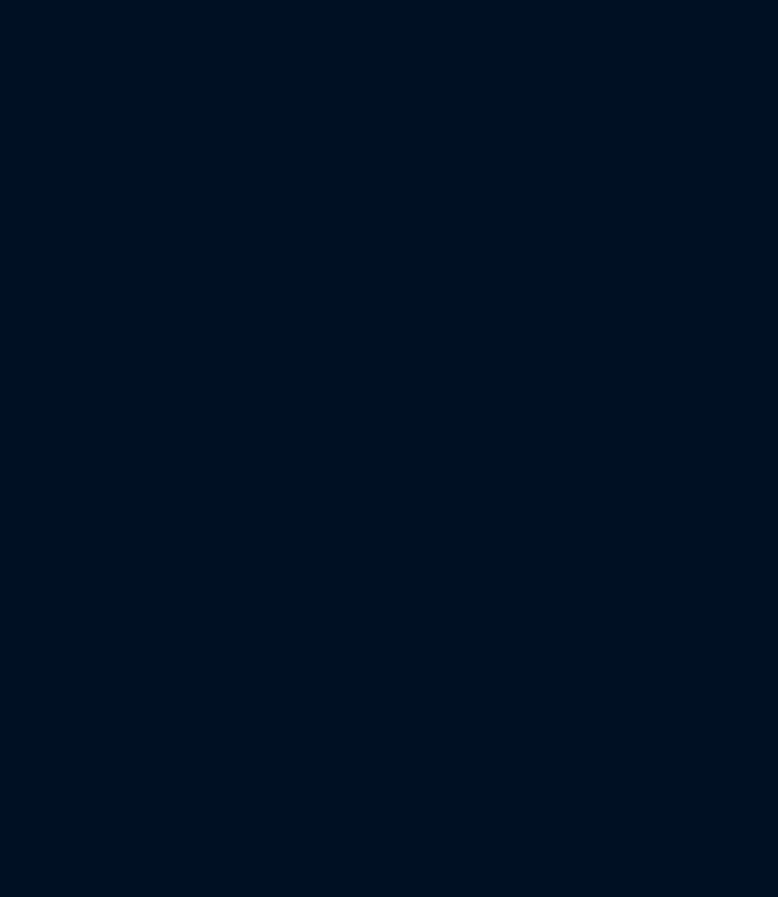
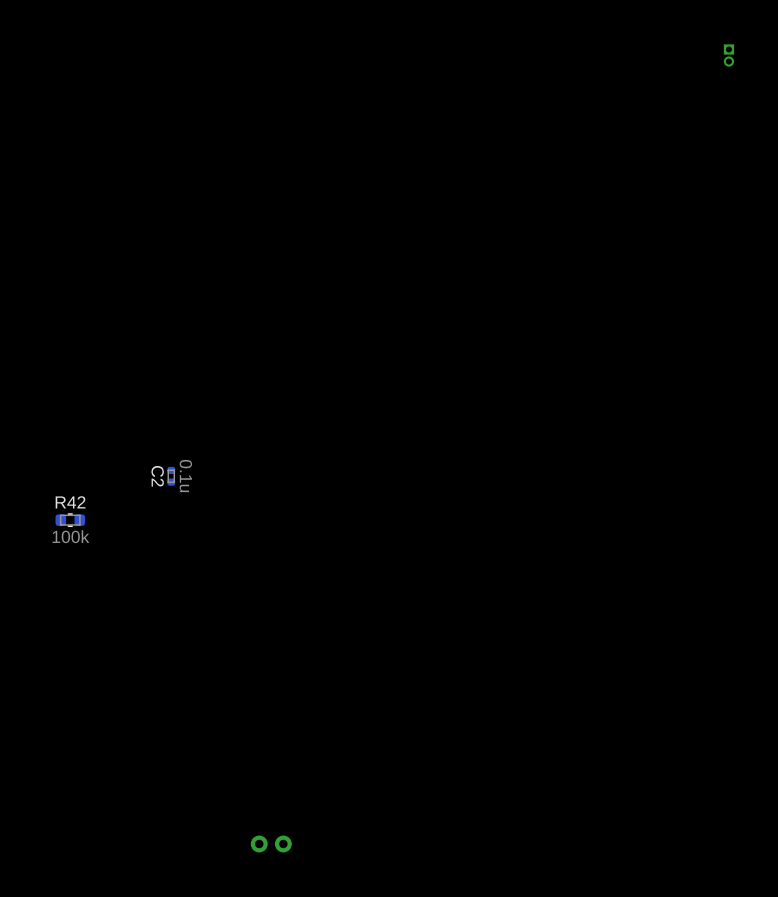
part: none -> (728, 55)
C2: none -> 0.1u (171, 476)
R42: none -> 100k (70, 520)
part: none -> (271, 843)

